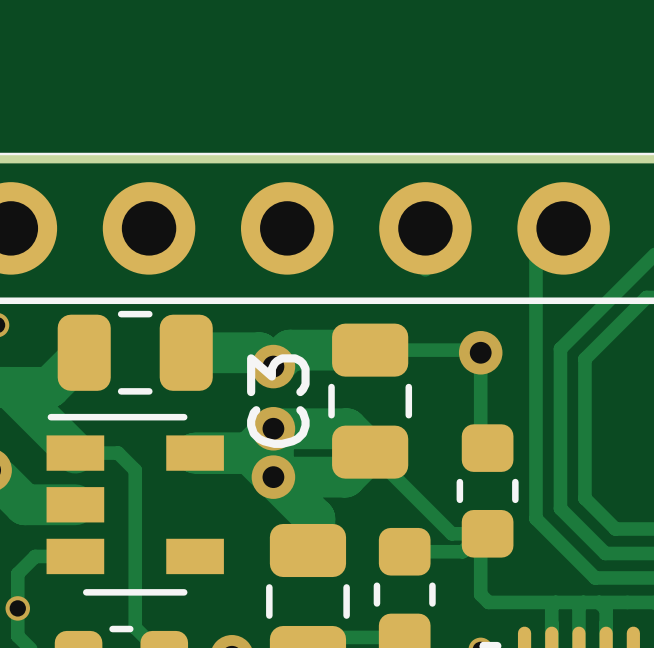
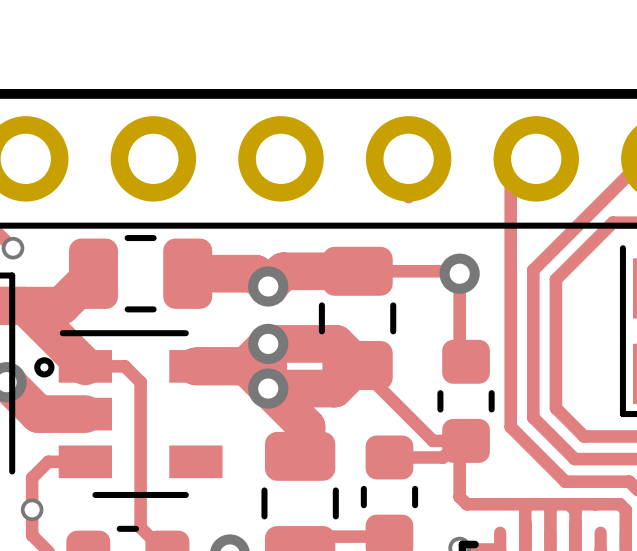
C3 name: C3 (278, 401) -> none
drawing: none -> [34, 357, 55, 378]

